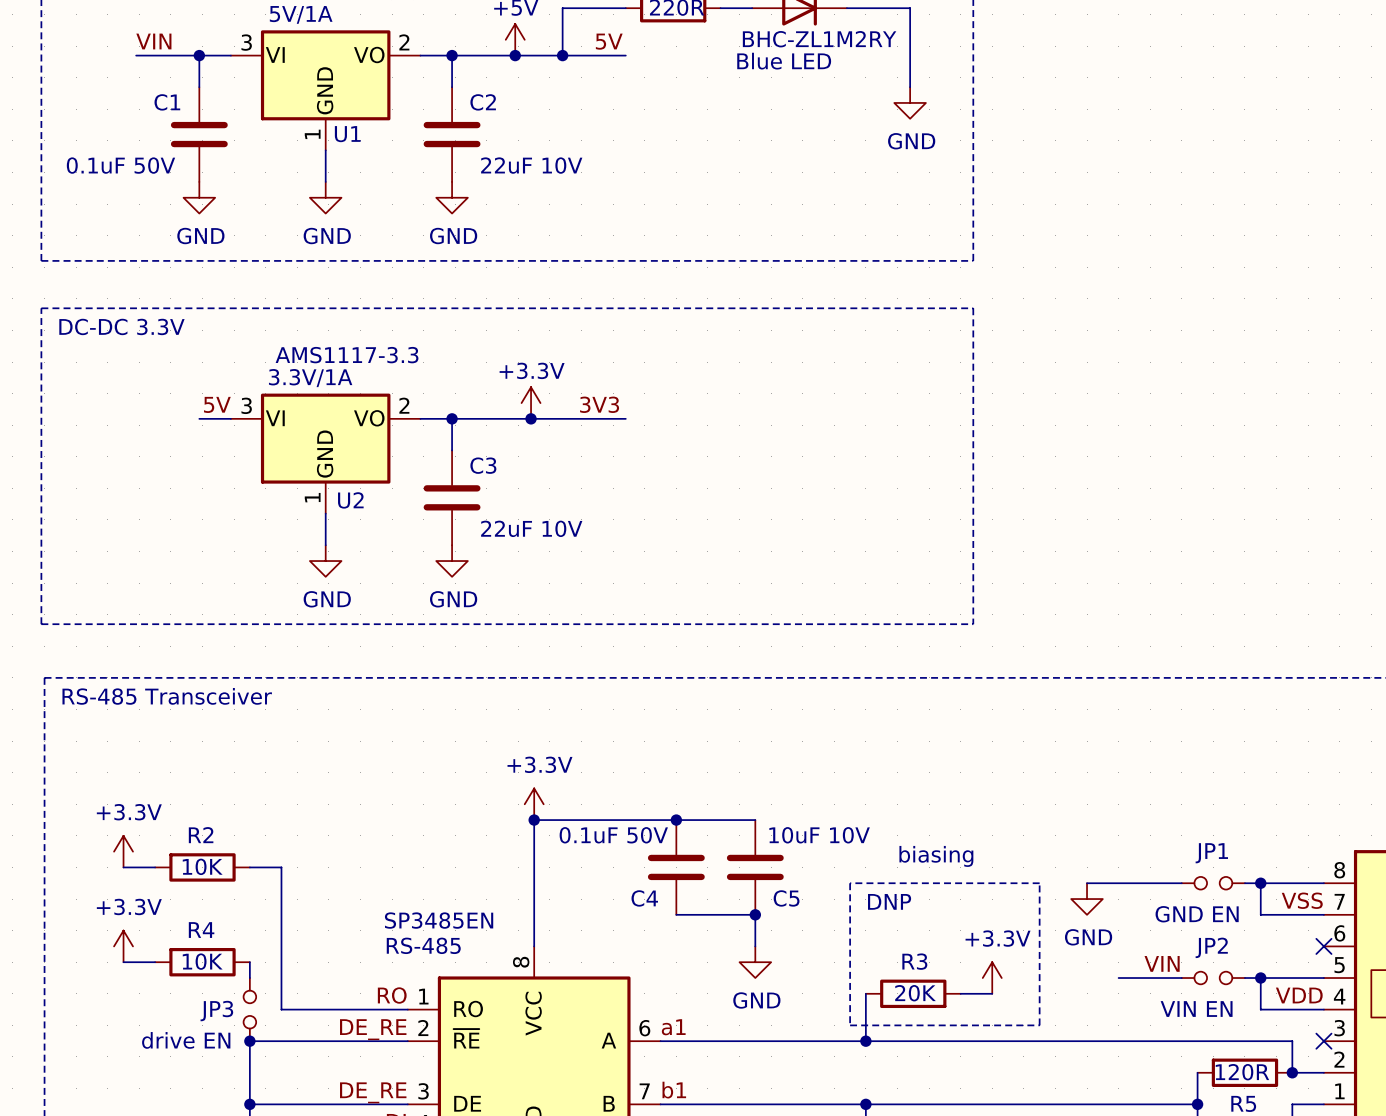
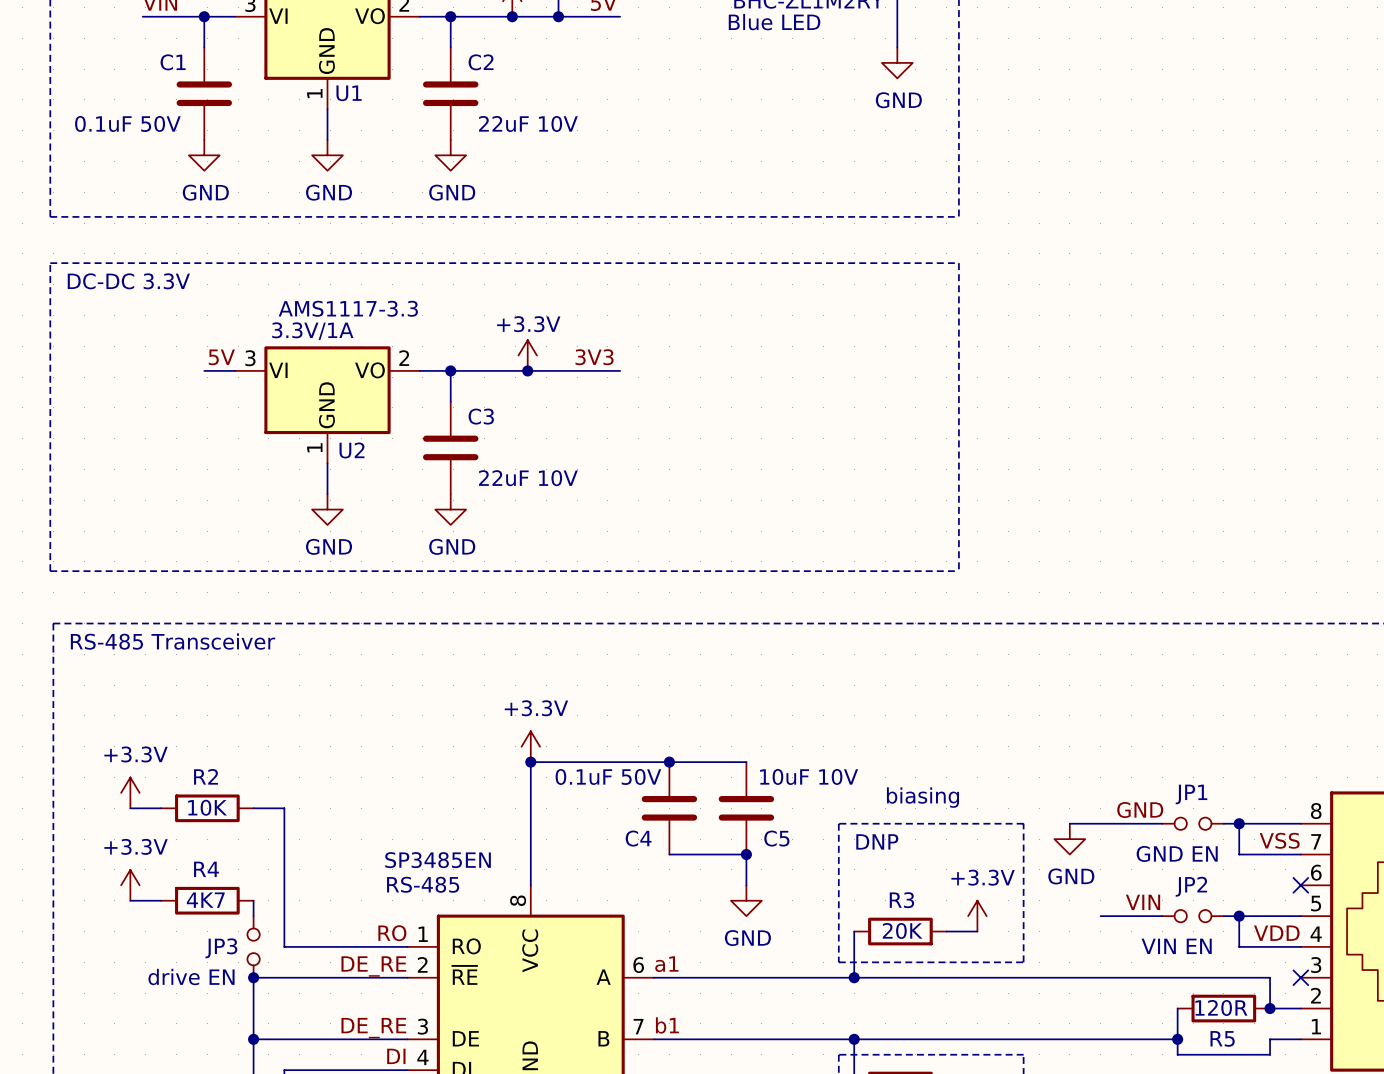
label: none -> GND (1140, 809)
R4 value: 10K (202, 961) -> 4K7 (205, 900)

